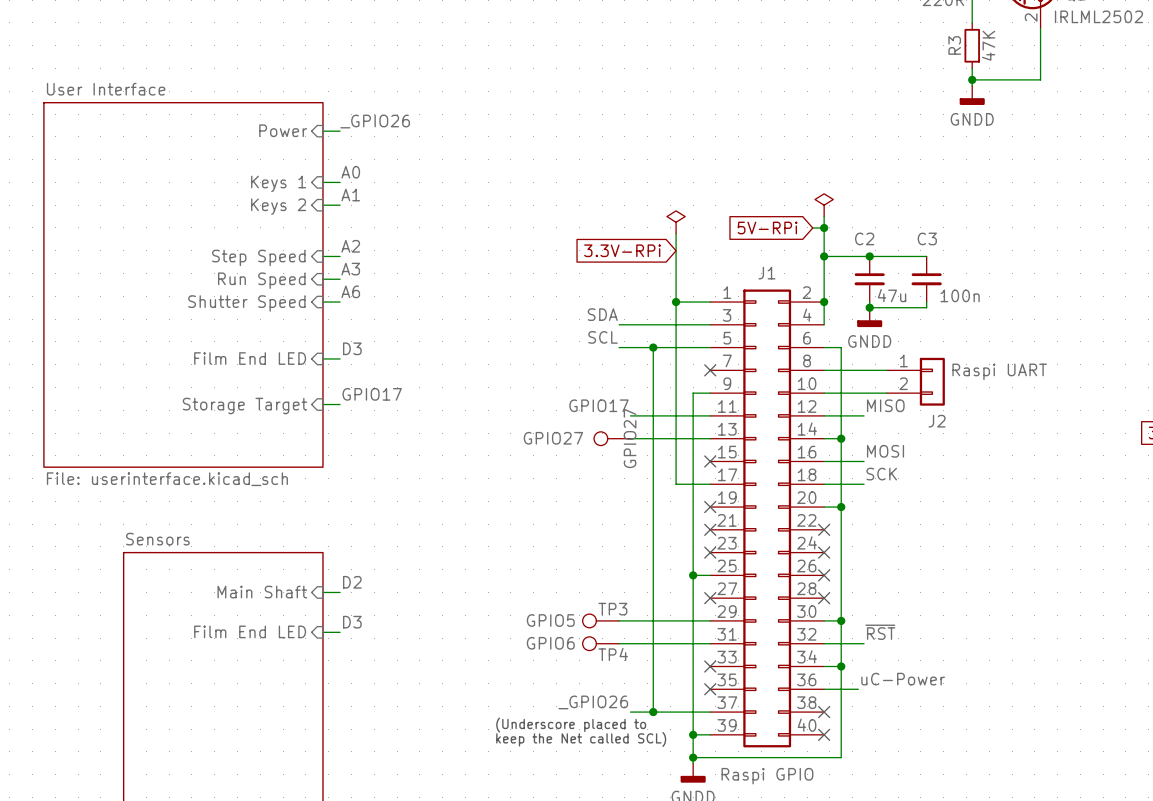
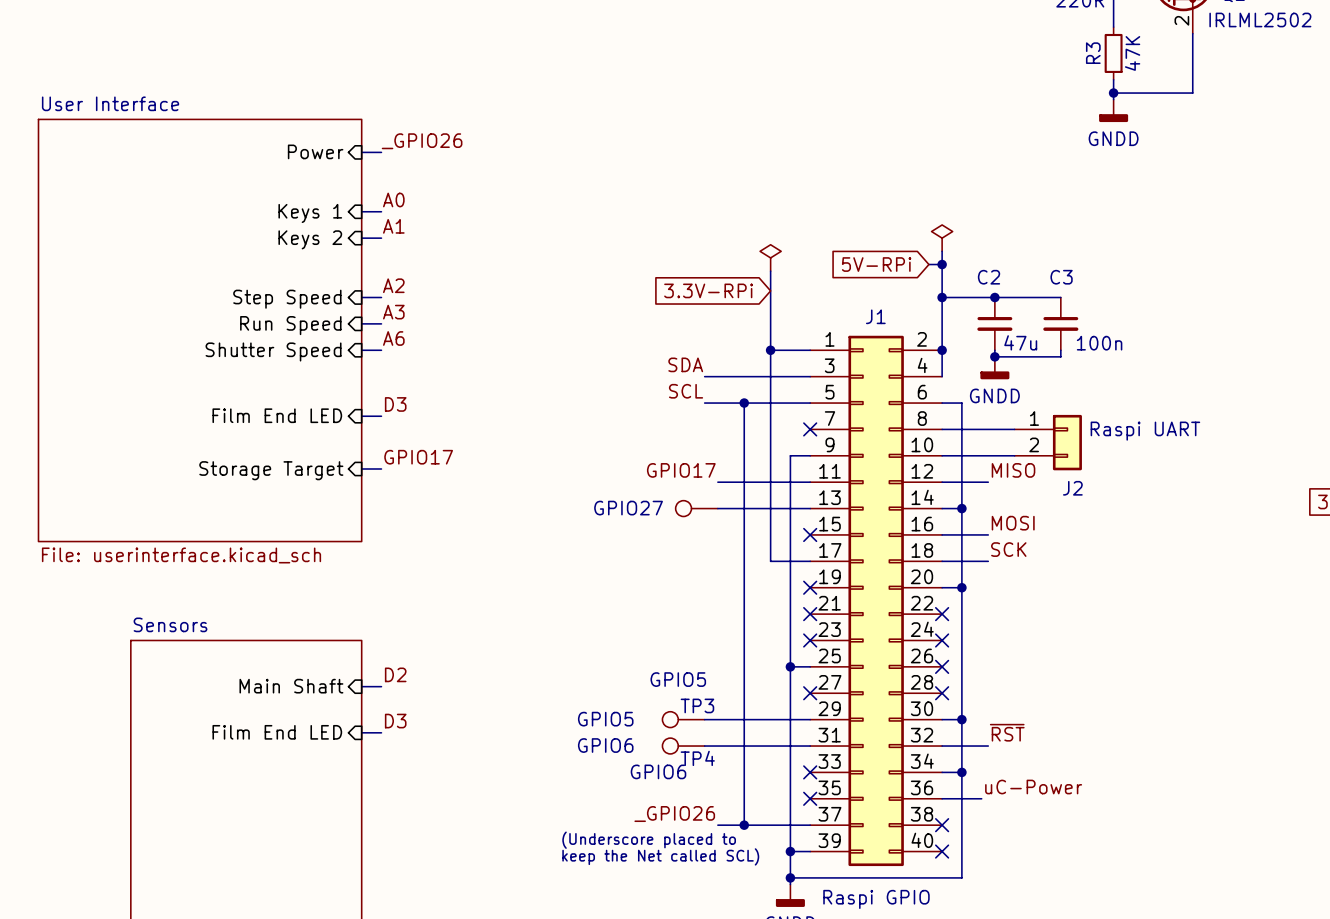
part text: GPIO27 (630, 438) -> none
TP3 value: none -> GPIO5 (605, 719)
TP3 text position: GPIO5 (550, 620) -> GPIO5 (678, 679)
TP4 value: none -> GPIO6 (605, 745)
TP4 text position: GPIO6 (550, 643) -> GPIO6 (658, 771)

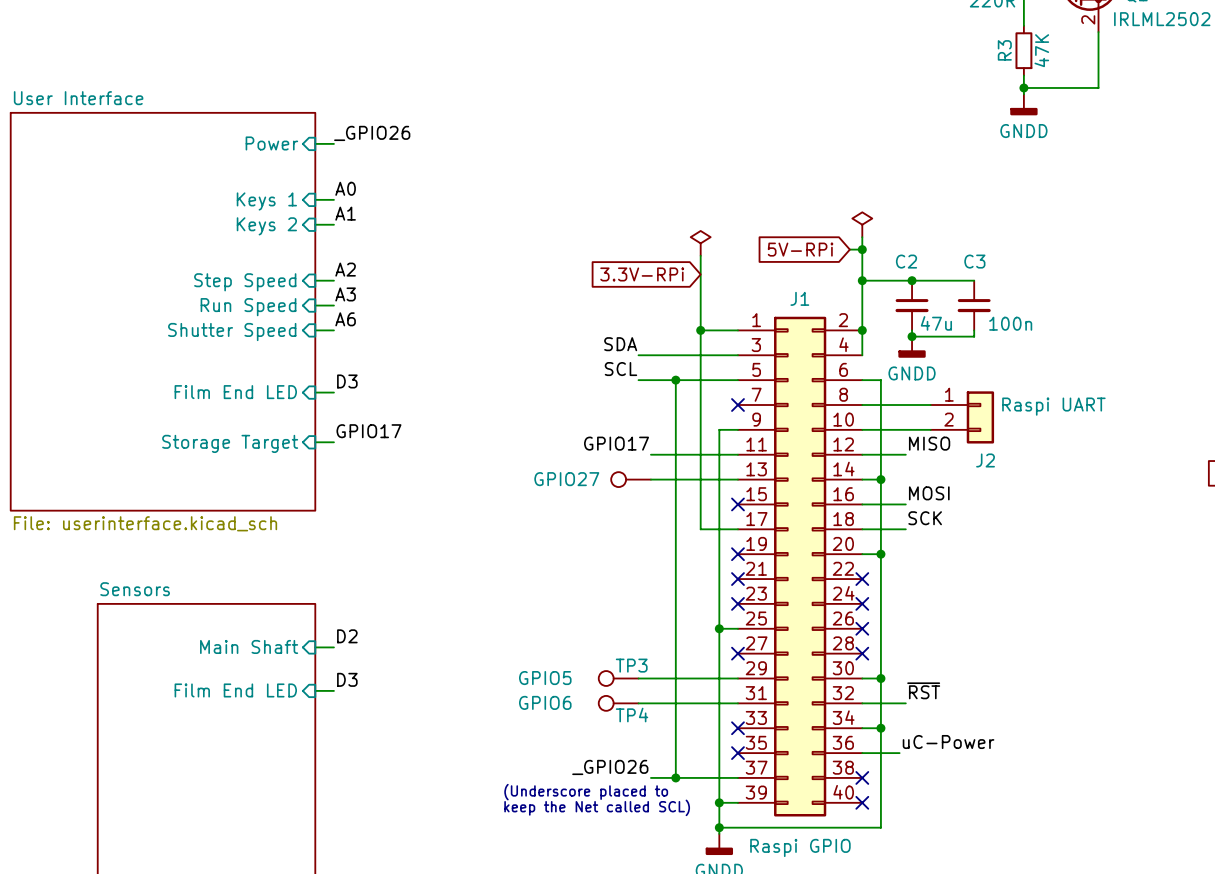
TP3 text: GPIO5 (678, 679) -> none
TP4 text: GPIO6 (658, 771) -> none

